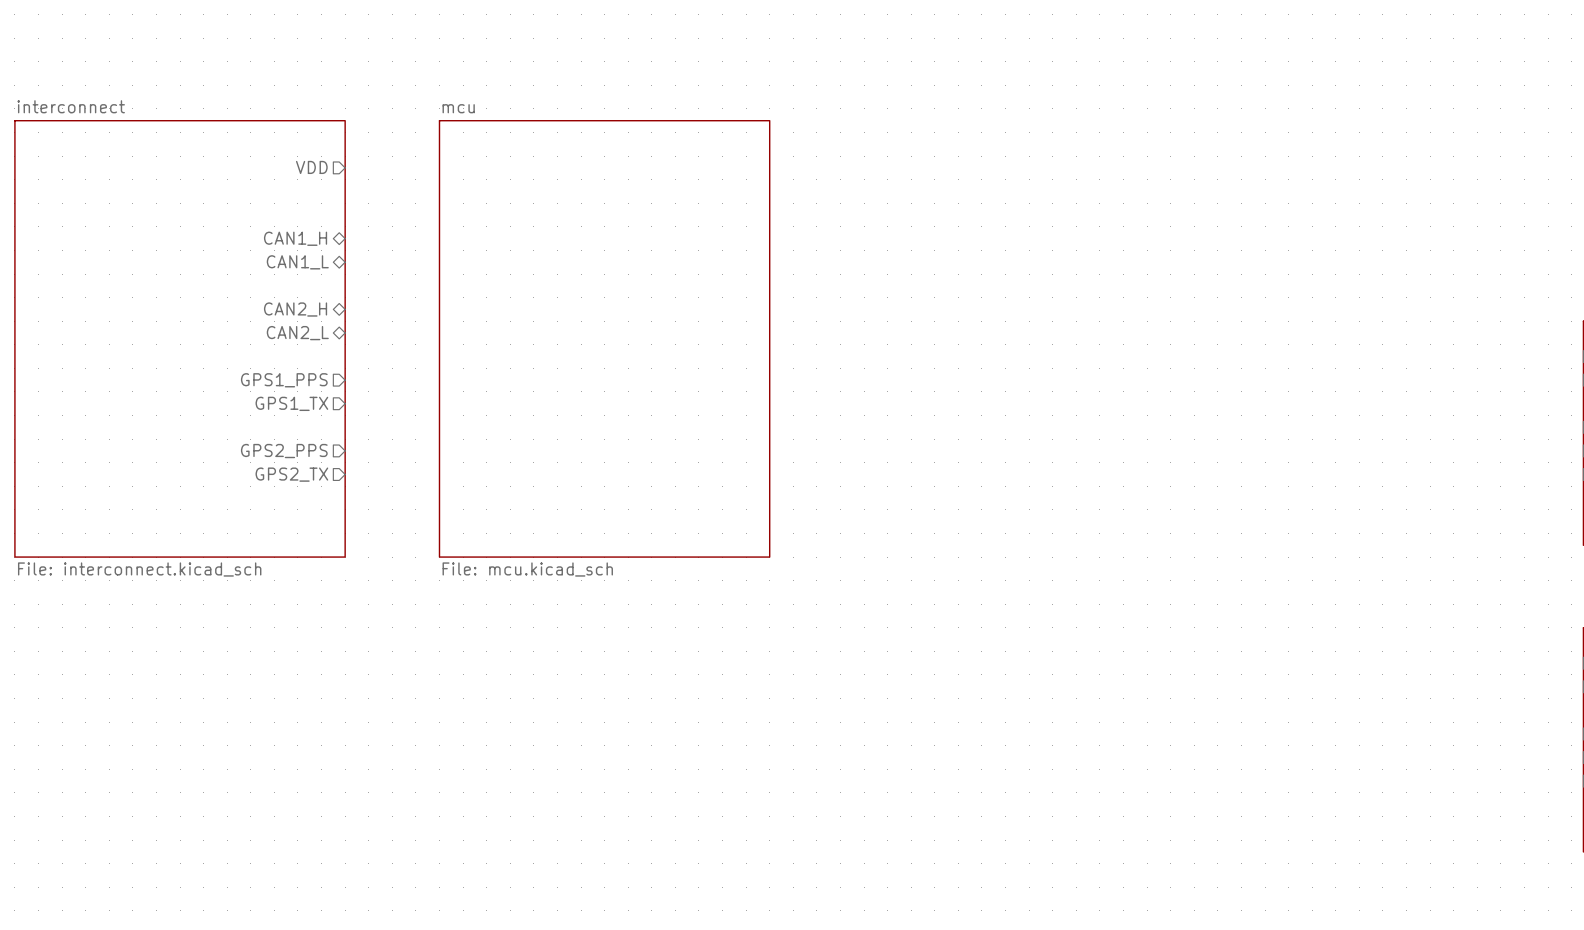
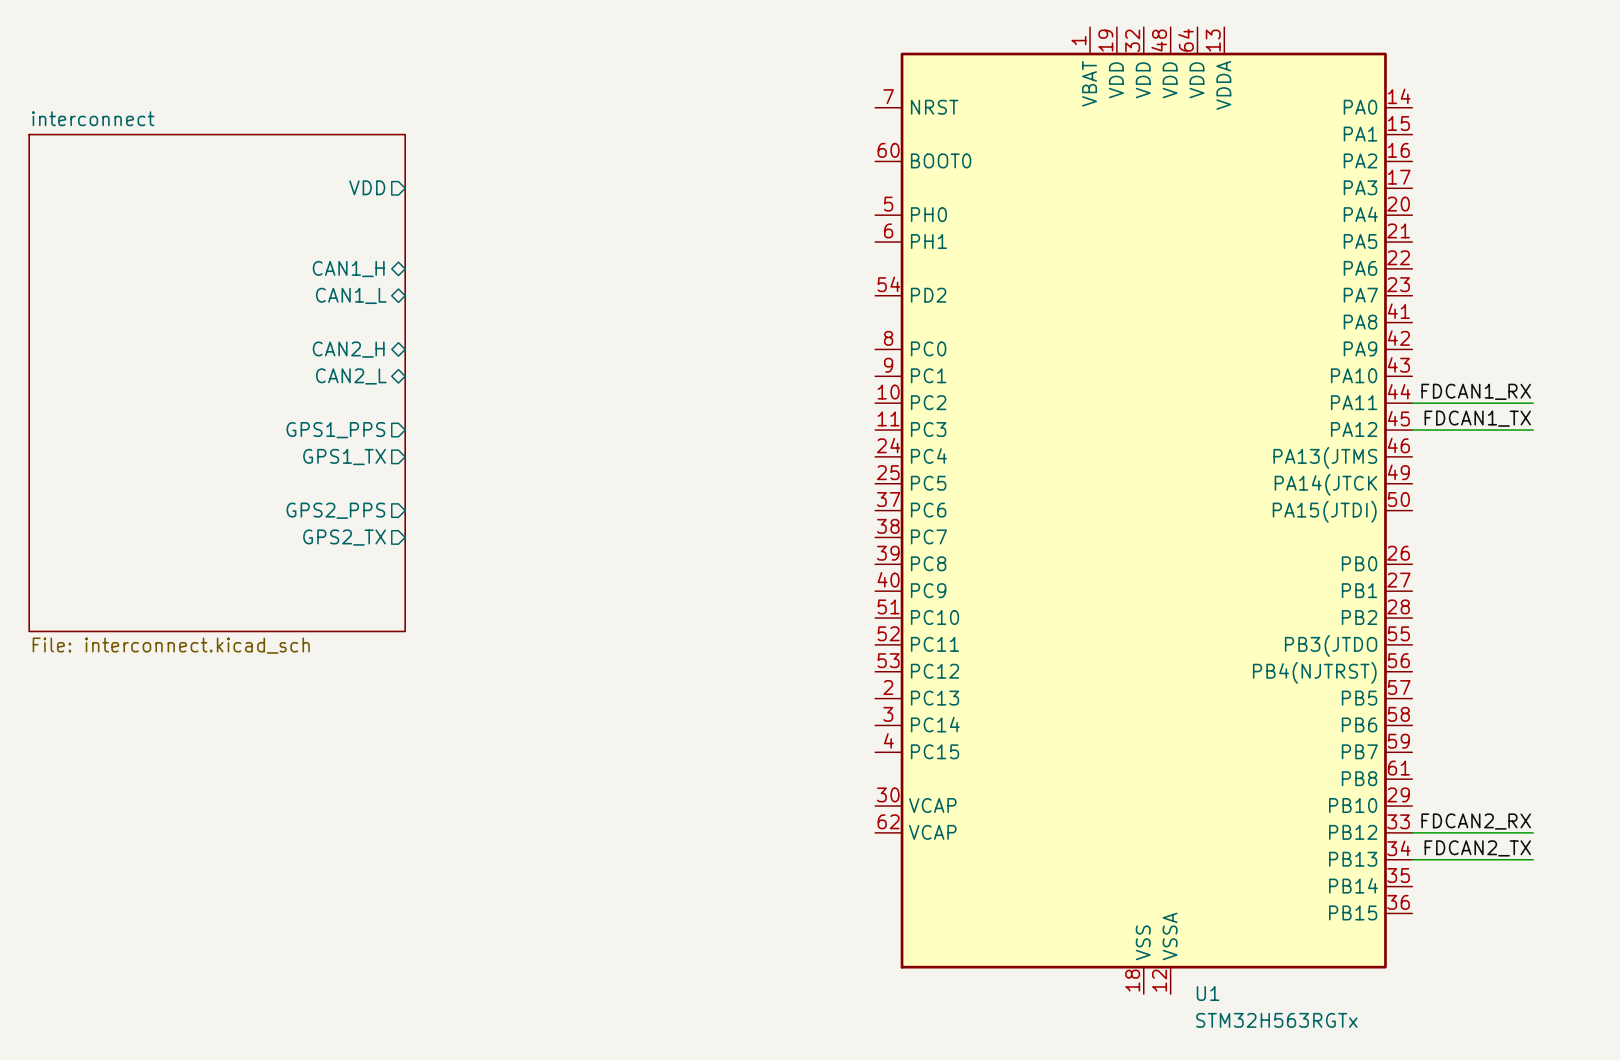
sheet mcu: File: mcu.kicad_sch (604, 338) -> none
label: none -> FDCAN1_RX (1476, 391)
wire: none -> (1412, 403) (1533, 403)
label: none -> FDCAN1_TX (1477, 418)
wire: none -> (1412, 430) (1533, 430)
U1: none -> STM32H563RGTx (1143, 510)
label: none -> FDCAN2_RX (1476, 821)
wire: none -> (1412, 832) (1533, 832)
label: none -> FDCAN2_TX (1477, 848)
wire: none -> (1412, 859) (1533, 859)

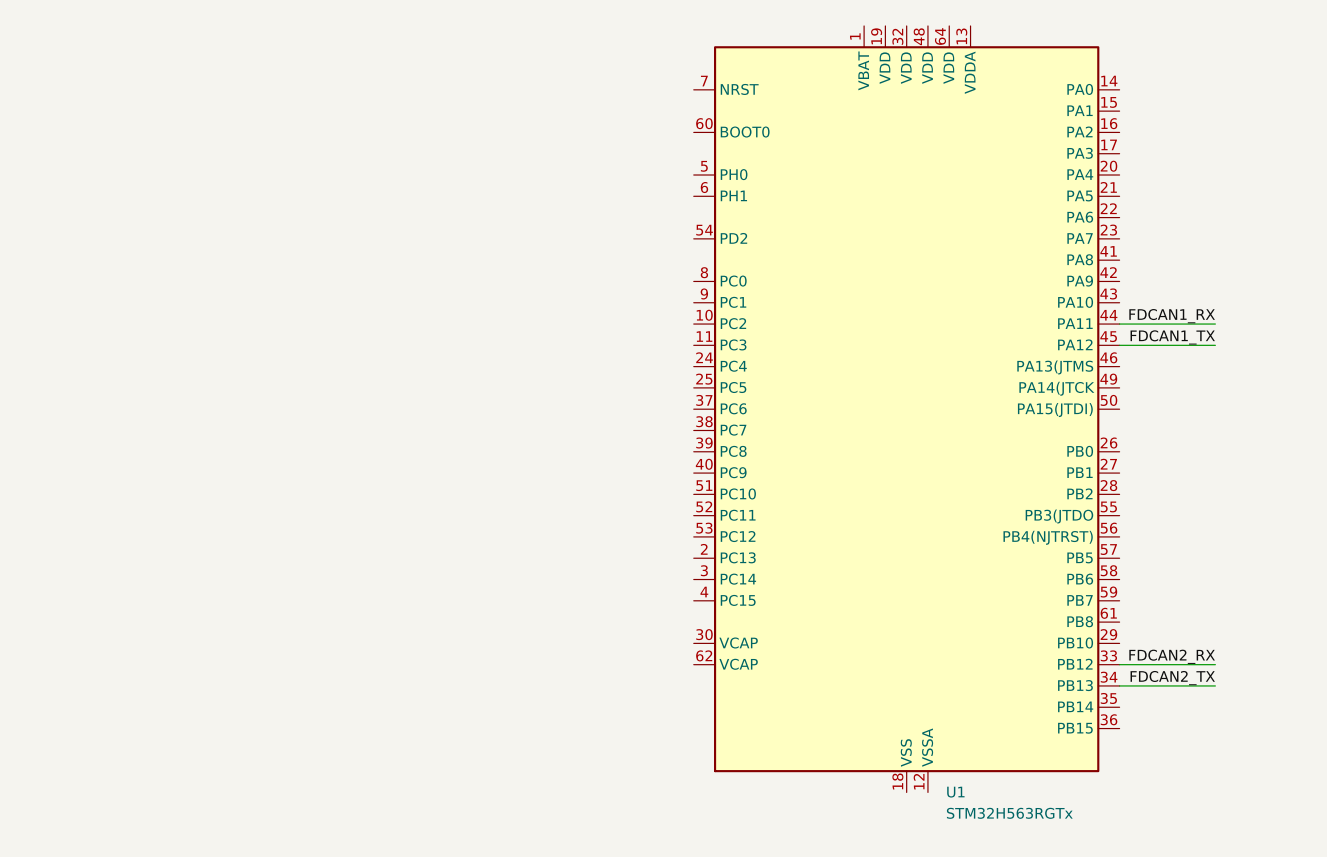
sheet pin: VDD (367, 187) -> none
sheet pin: CAN1_H (348, 269) -> none
sheet pin: CAN1_L (351, 295) -> none
sheet pin: CAN2_H (348, 349) -> none
sheet pin: CAN2_L (351, 376) -> none
sheet interconnect: File: interconnect.kicad_sch (217, 383) -> none
sheet pin: GPS1_PPS (335, 430) -> none
sheet pin: GPS1_TX (344, 457) -> none
sheet pin: GPS2_PPS (335, 510) -> none
sheet pin: GPS2_TX (344, 537) -> none

